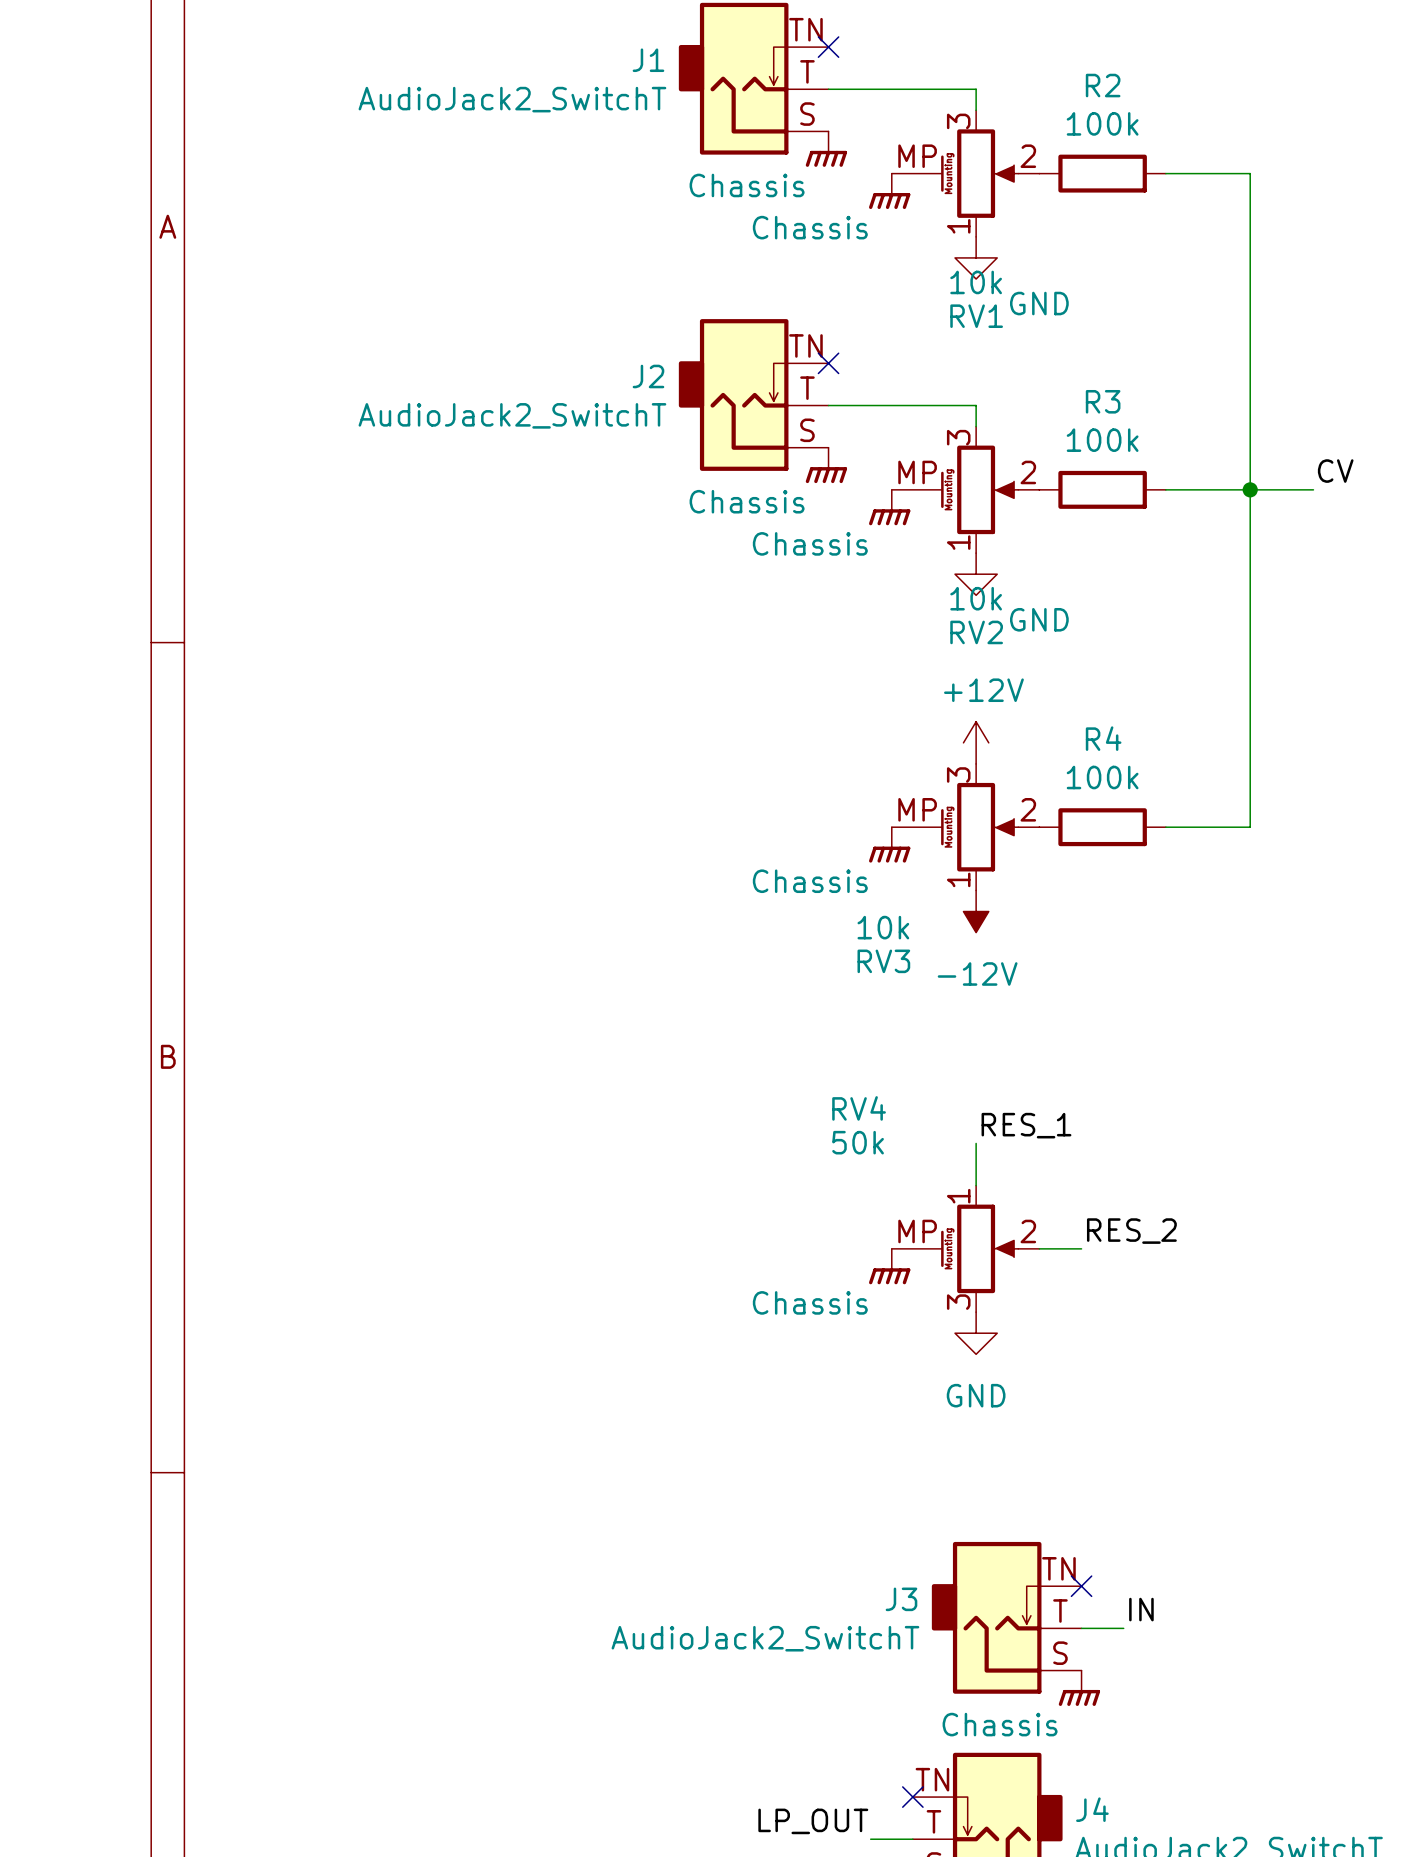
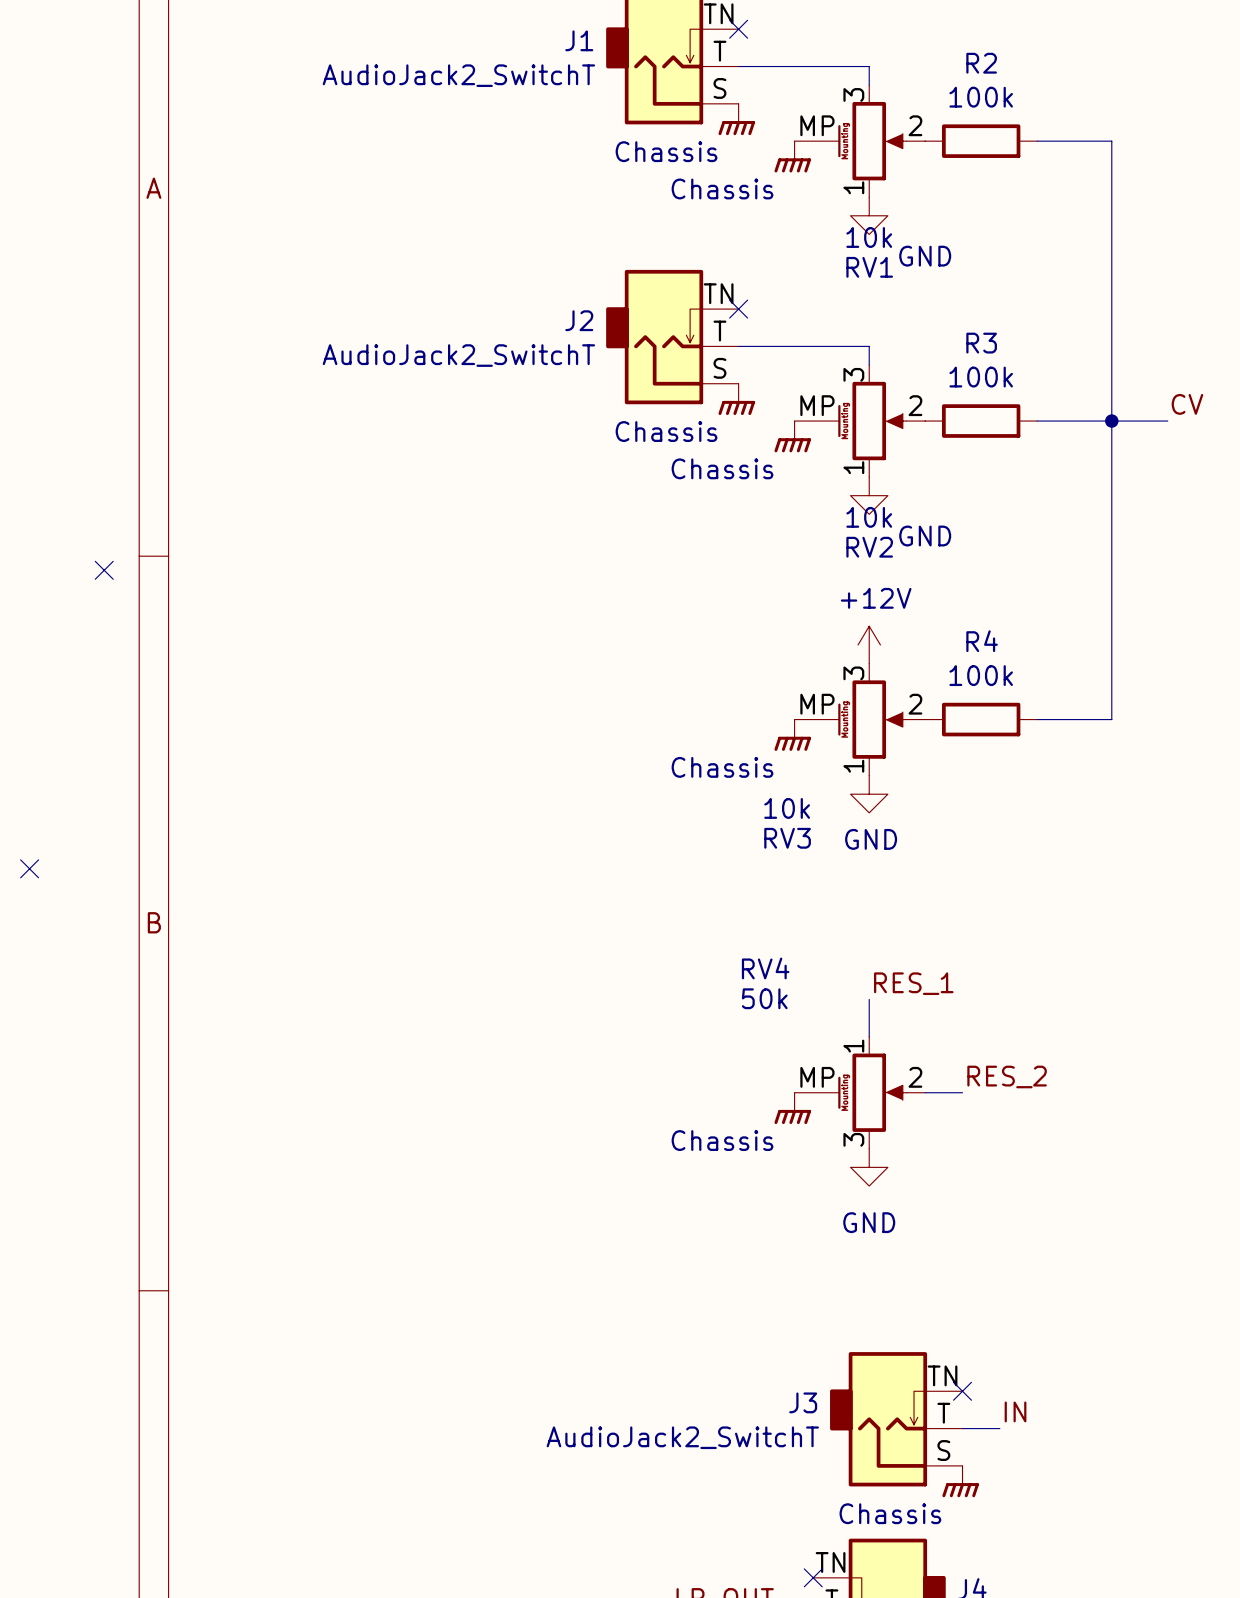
no-connect mark: none -> (104, 570)
power symbol: -12V (976, 911) -> GND (869, 794)
no-connect mark: none -> (29, 868)

